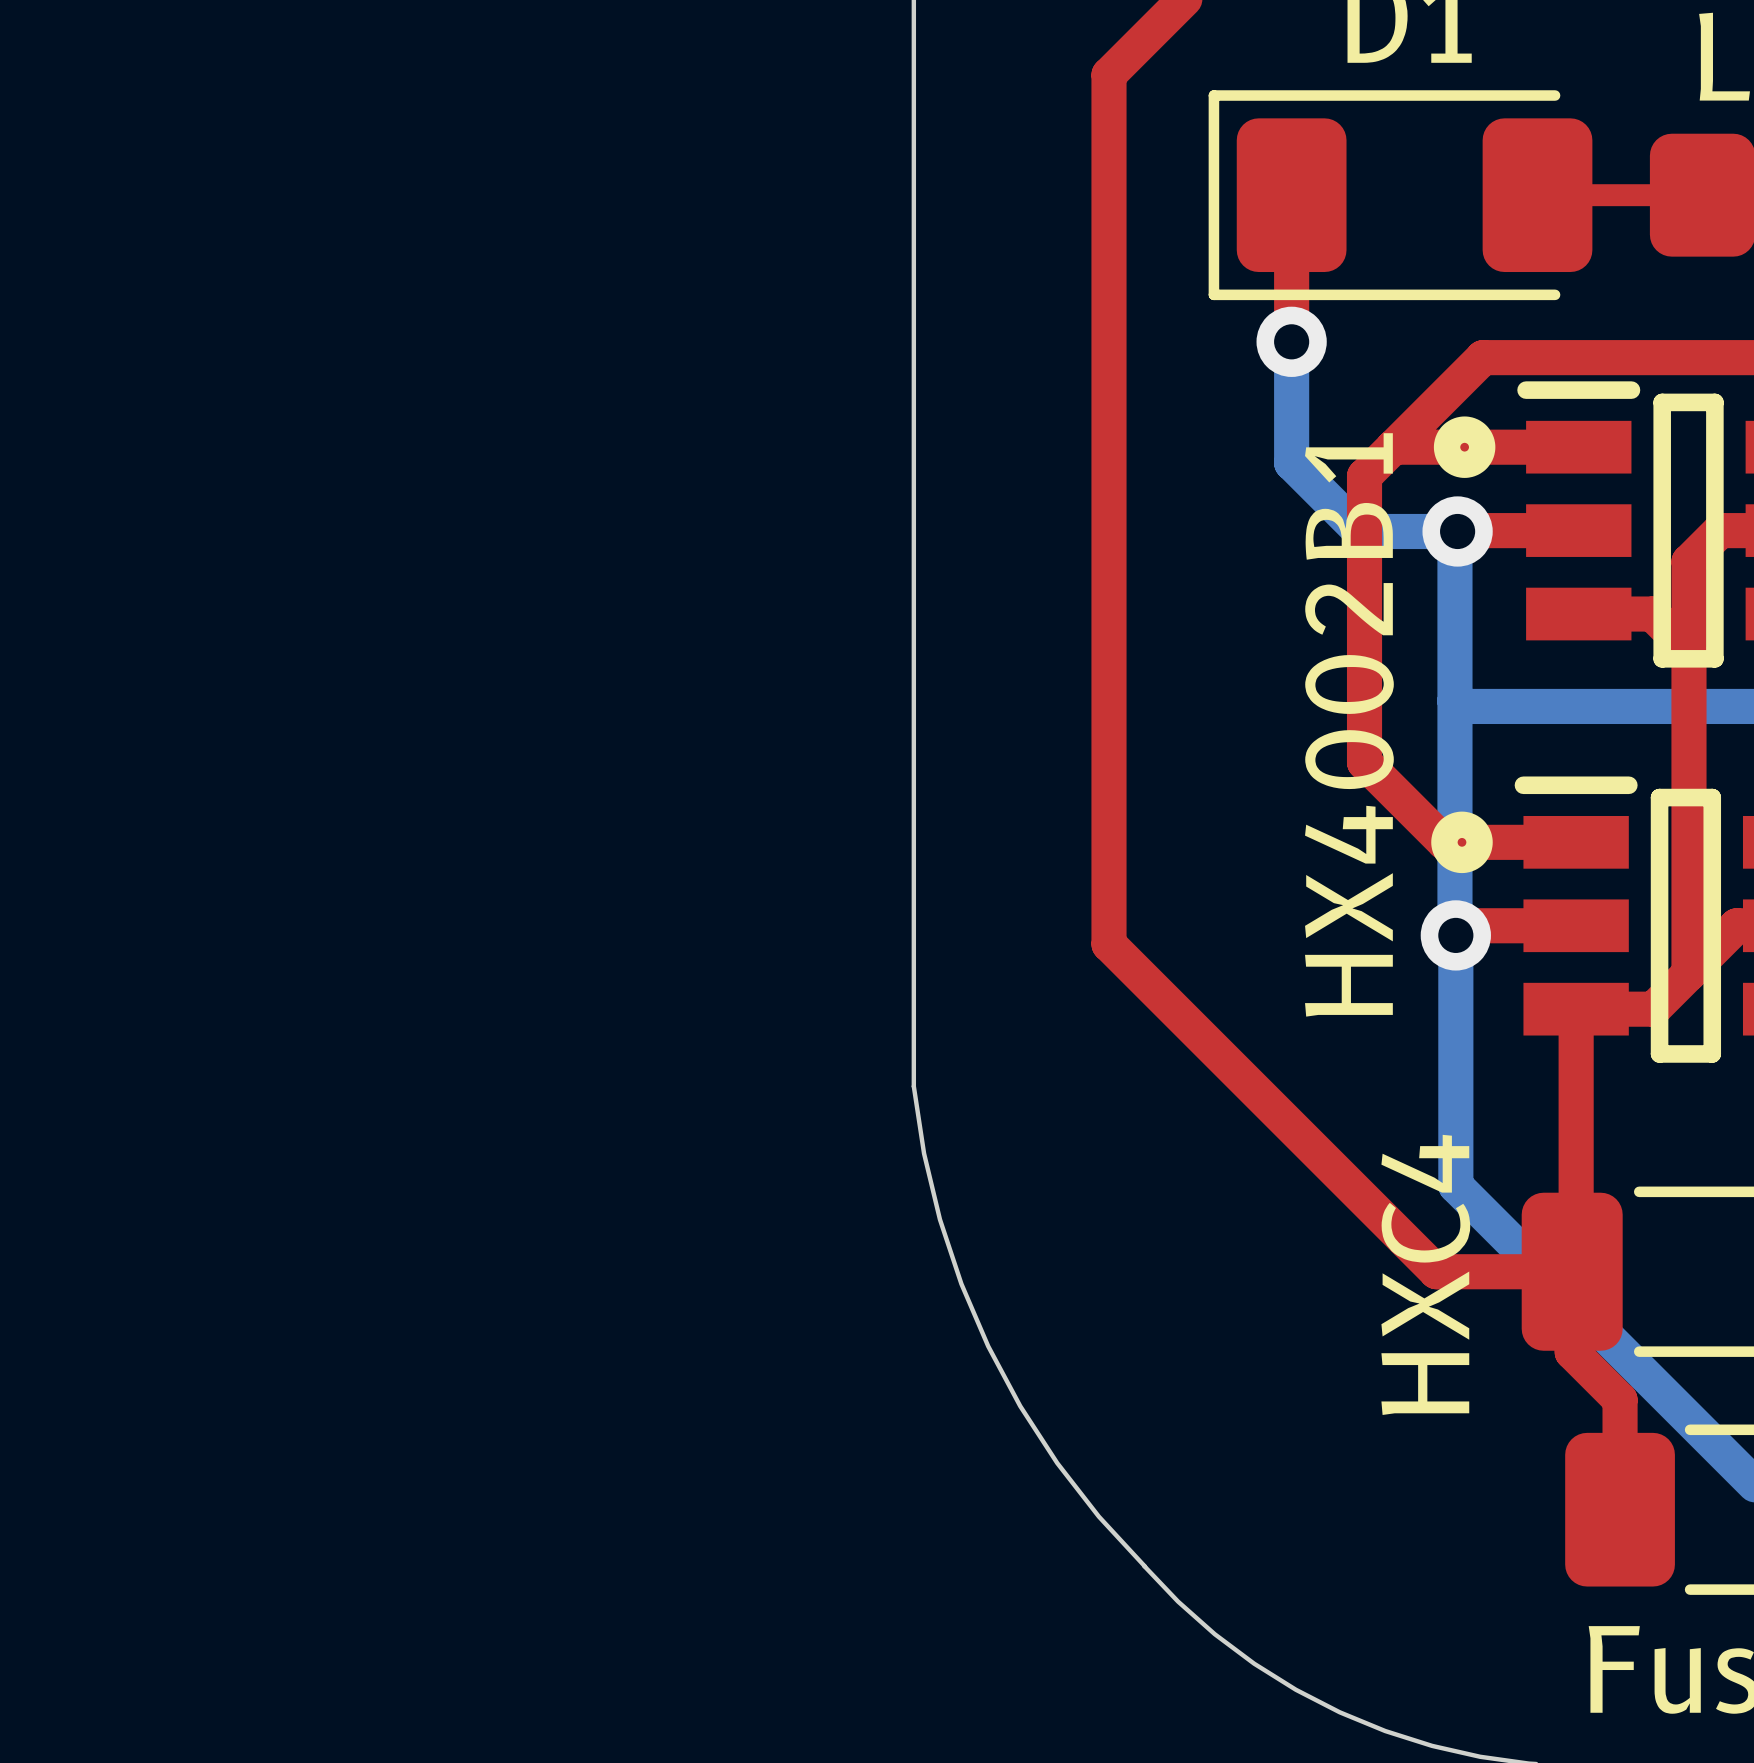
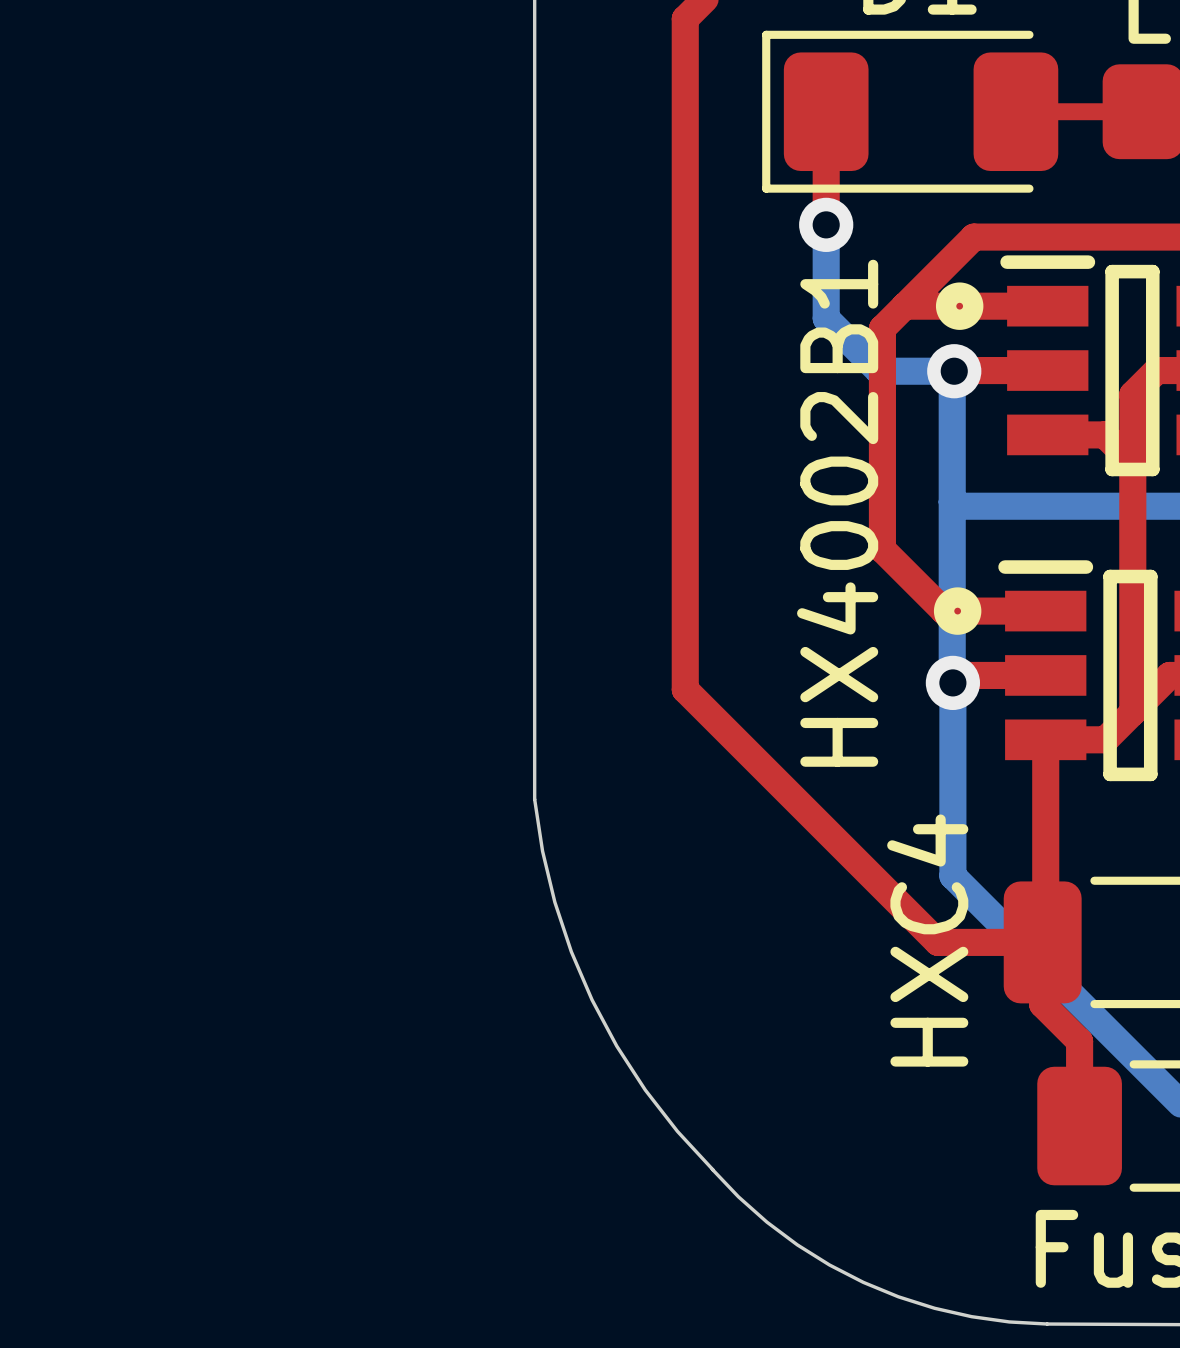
HX4002B1 name position: HX4002B1 (1349, 724) -> HX4002B1 (837, 513)

